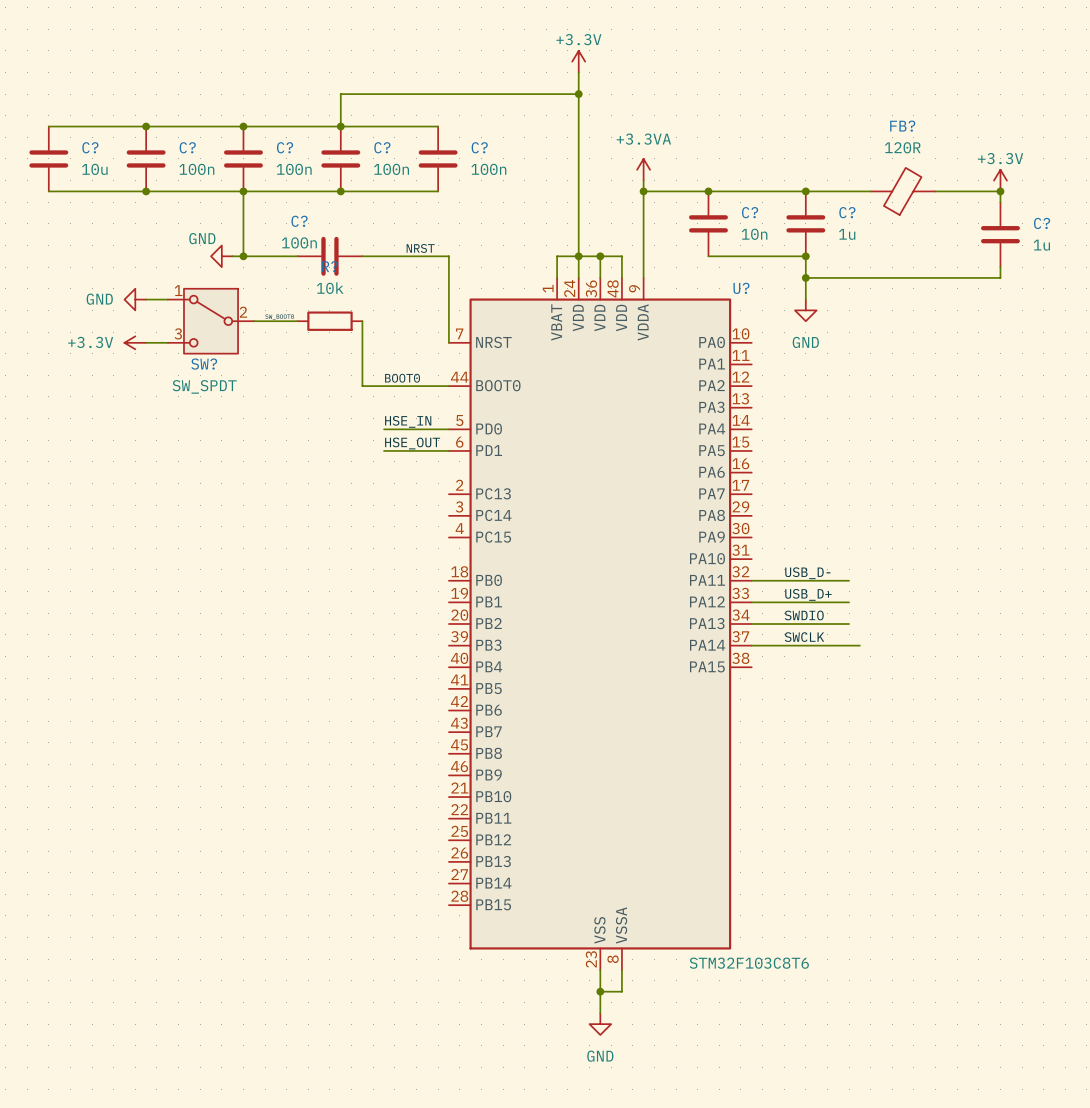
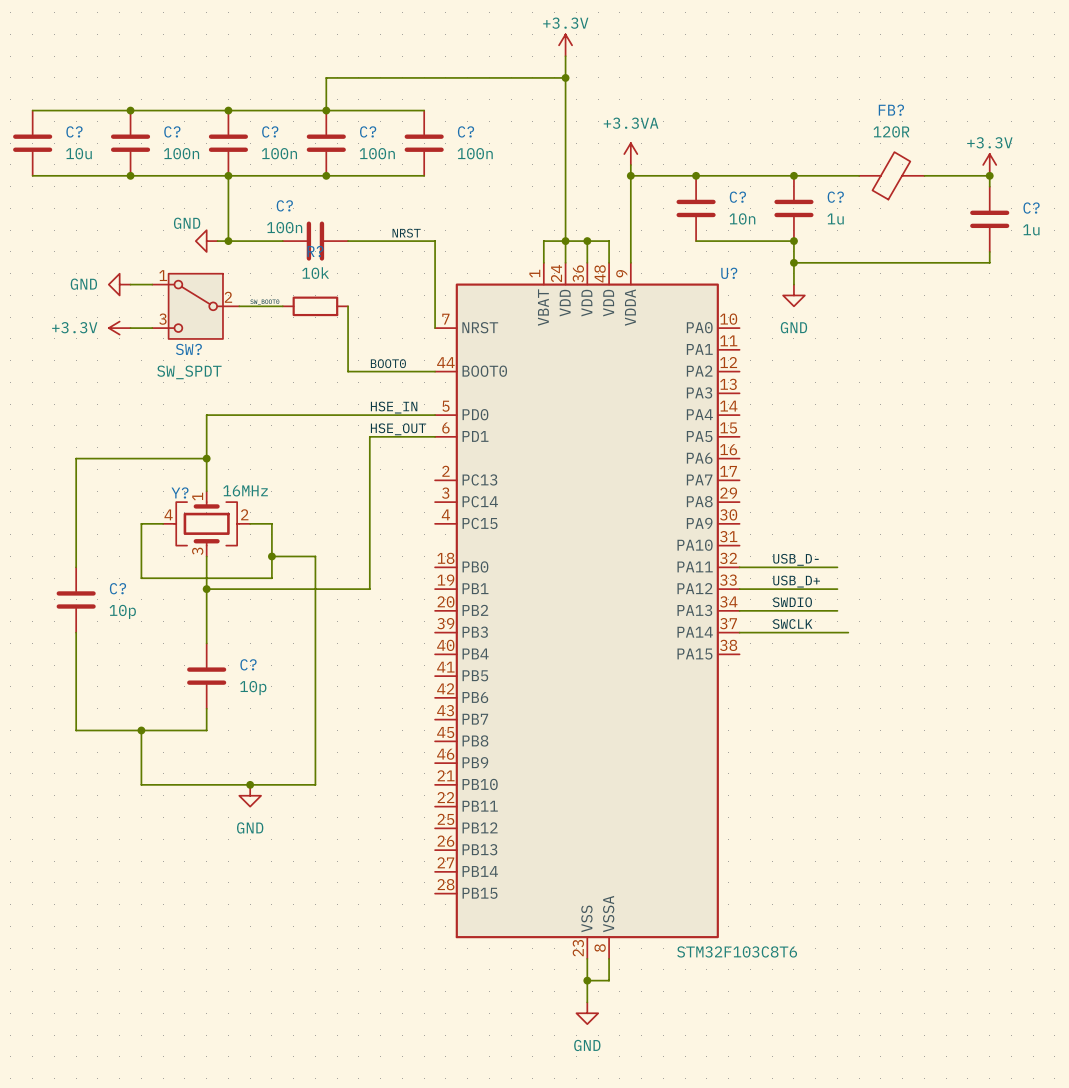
wire: none -> (369, 415) (206, 415) (206, 491)
wire: none -> (369, 436) (369, 589) (206, 589)
wire: none -> (206, 458) (76, 458) (76, 567)
junction: none -> (206, 458)
wire: none -> (163, 523) (141, 523) (141, 578) (271, 578) (271, 523) (250, 523)
Y?: none -> 16MHz (206, 523)
wire: none -> (206, 556) (206, 643)
wire: none -> (271, 556) (315, 556) (315, 784) (141, 784) (141, 730)
junction: none -> (271, 556)
junction: none -> (206, 589)
C?: none -> 10p (76, 599)
wire: none -> (76, 632) (76, 730) (206, 730) (206, 708)
C?: none -> 10p (206, 676)
junction: none -> (141, 730)
junction: none -> (250, 784)
power symbol: none -> GND (250, 795)

